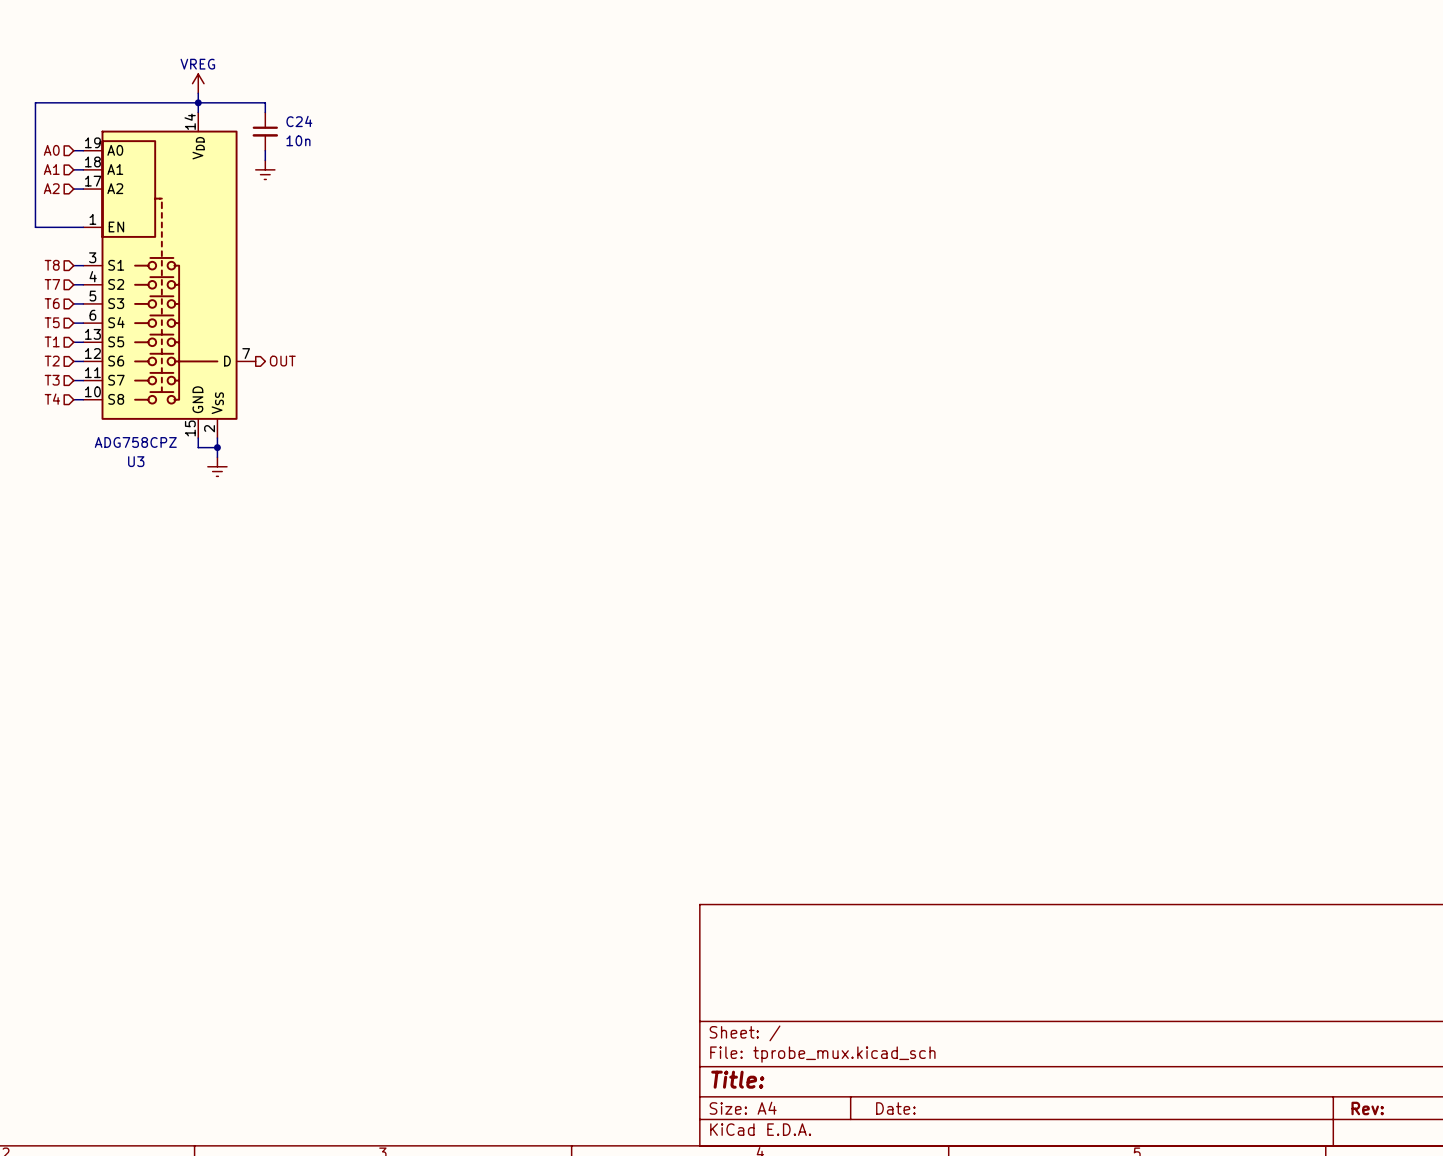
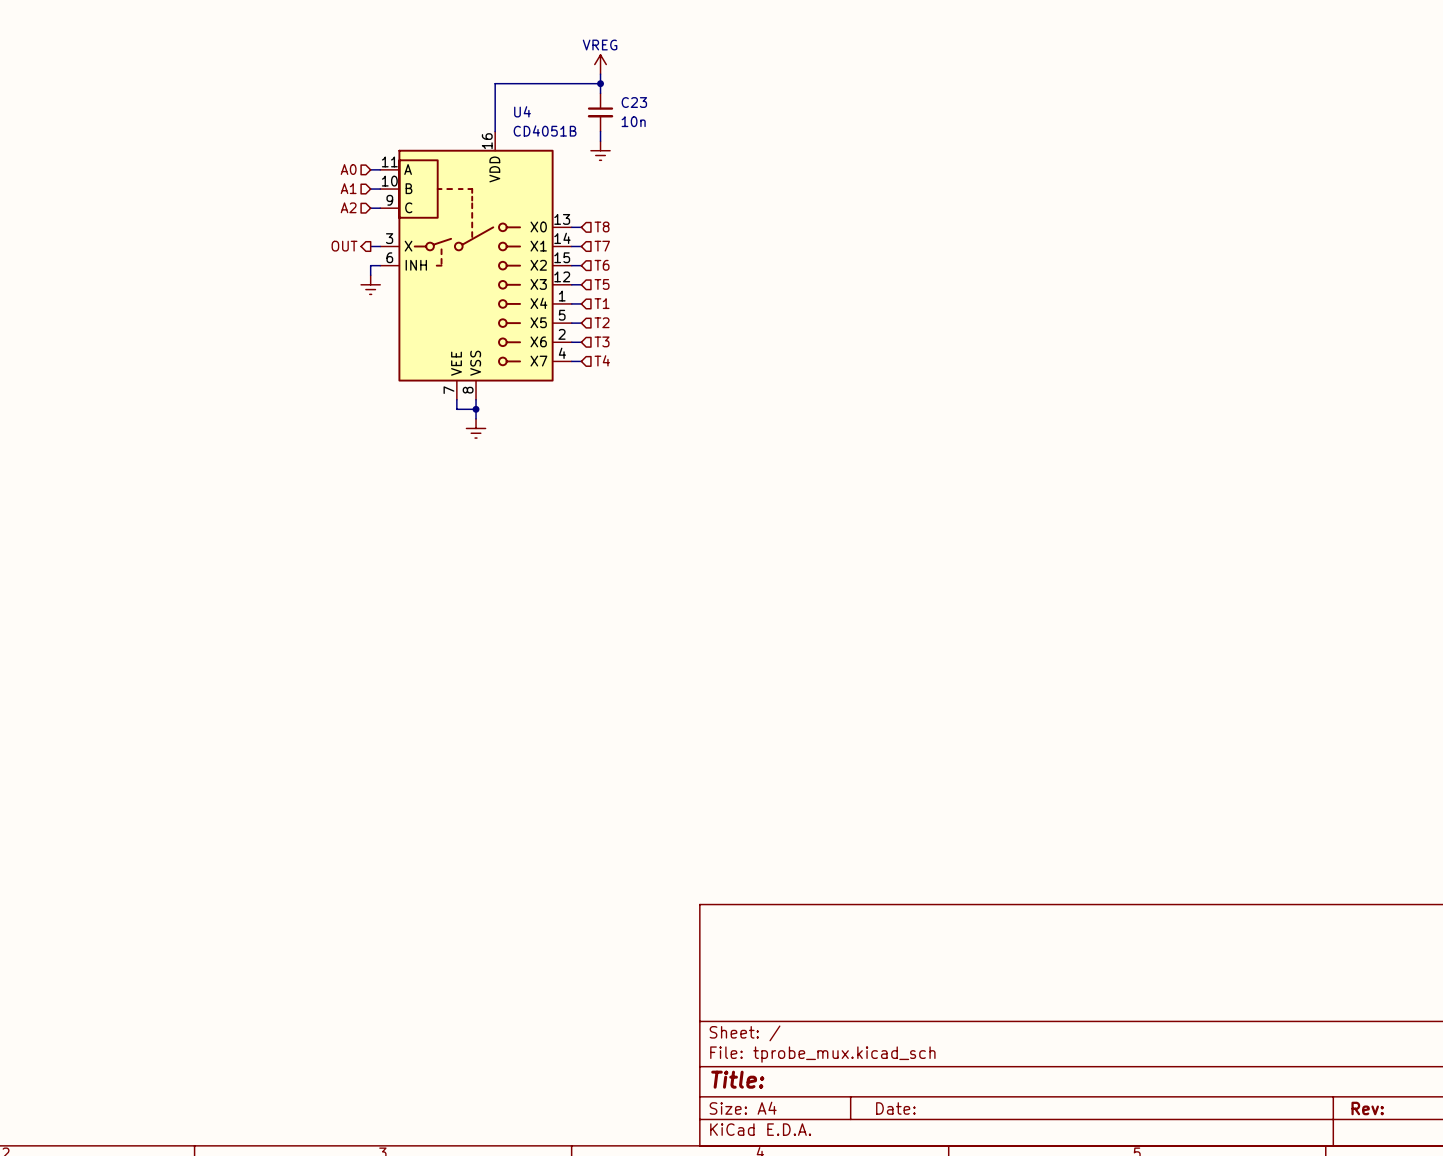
power symbol: none -> VREG (600, 64)
wire: none -> (600, 74) (600, 93)
power symbol: VREG (198, 83) -> none
wire: none -> (600, 83) (495, 83) (495, 131)
junction: none -> (600, 83)
wire: (198, 93) (198, 112) -> none
junction: (198, 102) -> none
wire: (265, 112) (265, 102) (35, 102) (35, 227) (83, 227) -> none
C23: none -> 10n (600, 112)
C24: 10n (265, 131) -> none
wire: none -> (600, 131) (600, 141)
hierarchical label: A0 (51, 150) -> none
wire: (73, 150) (83, 150) -> none
wire: (265, 150) (265, 160) -> none
power symbol: none -> (600, 150)
hierarchical label: A1 (51, 169) -> none
wire: (73, 169) (83, 169) -> none
power symbol: (265, 169) -> none
hierarchical label: none -> A0 (348, 169)
wire: none -> (370, 169) (380, 169)
hierarchical label: A2 (51, 188) -> none
hierarchical label: none -> A1 (348, 188)
wire: (73, 189) (83, 189) -> none
wire: none -> (370, 189) (380, 189)
hierarchical label: none -> A2 (348, 207)
wire: none -> (370, 208) (380, 208)
hierarchical label: none -> T8 (602, 226)
wire: none -> (571, 227) (581, 227)
wire: none -> (370, 246) (380, 246)
wire: none -> (571, 246) (581, 246)
hierarchical label: none -> T7 (602, 246)
hierarchical label: T8 (52, 265) -> none
wire: (73, 265) (83, 265) -> none
wire: none -> (380, 265) (370, 265) (370, 275)
U4: none -> CD4051B (476, 265)
wire: none -> (571, 265) (581, 265)
hierarchical label: none -> T6 (602, 265)
U3: ADG758CPZ (169, 275) -> none
hierarchical label: T7 (52, 284) -> none
wire: (73, 284) (83, 284) -> none
power symbol: none -> (370, 284)
wire: none -> (571, 284) (581, 284)
hierarchical label: none -> T5 (602, 284)
hierarchical label: T6 (52, 303) -> none
wire: (73, 303) (83, 303) -> none
wire: none -> (571, 303) (581, 303)
hierarchical label: none -> T1 (602, 303)
hierarchical label: T5 (52, 322) -> none
hierarchical label: none -> T2 (602, 322)
wire: (73, 323) (83, 323) -> none
wire: none -> (571, 323) (581, 323)
hierarchical label: T1 (52, 341) -> none
hierarchical label: none -> T3 (602, 341)
wire: (73, 342) (83, 342) -> none
wire: none -> (571, 342) (581, 342)
hierarchical label: none -> T4 (602, 360)
hierarchical label: T2 (52, 361) -> none
wire: (73, 361) (83, 361) -> none
hierarchical label rotation: 0° (282, 361) -> 180° (344, 246)
hierarchical label position: OUT (282, 361) -> OUT (344, 246)
wire: none -> (571, 361) (581, 361)
hierarchical label: T3 (52, 380) -> none
wire: (73, 380) (83, 380) -> none
hierarchical label: T4 (52, 399) -> none
wire: (73, 399) (83, 399) -> none
wire: none -> (456, 399) (456, 409) (476, 409)
wire: none -> (476, 399) (476, 418)
junction: none -> (476, 409)
power symbol: none -> (476, 428)
wire: (198, 438) (198, 447) (217, 447) -> none
wire: (217, 438) (217, 457) -> none
junction: (217, 447) -> none
power symbol: (217, 466) -> none

